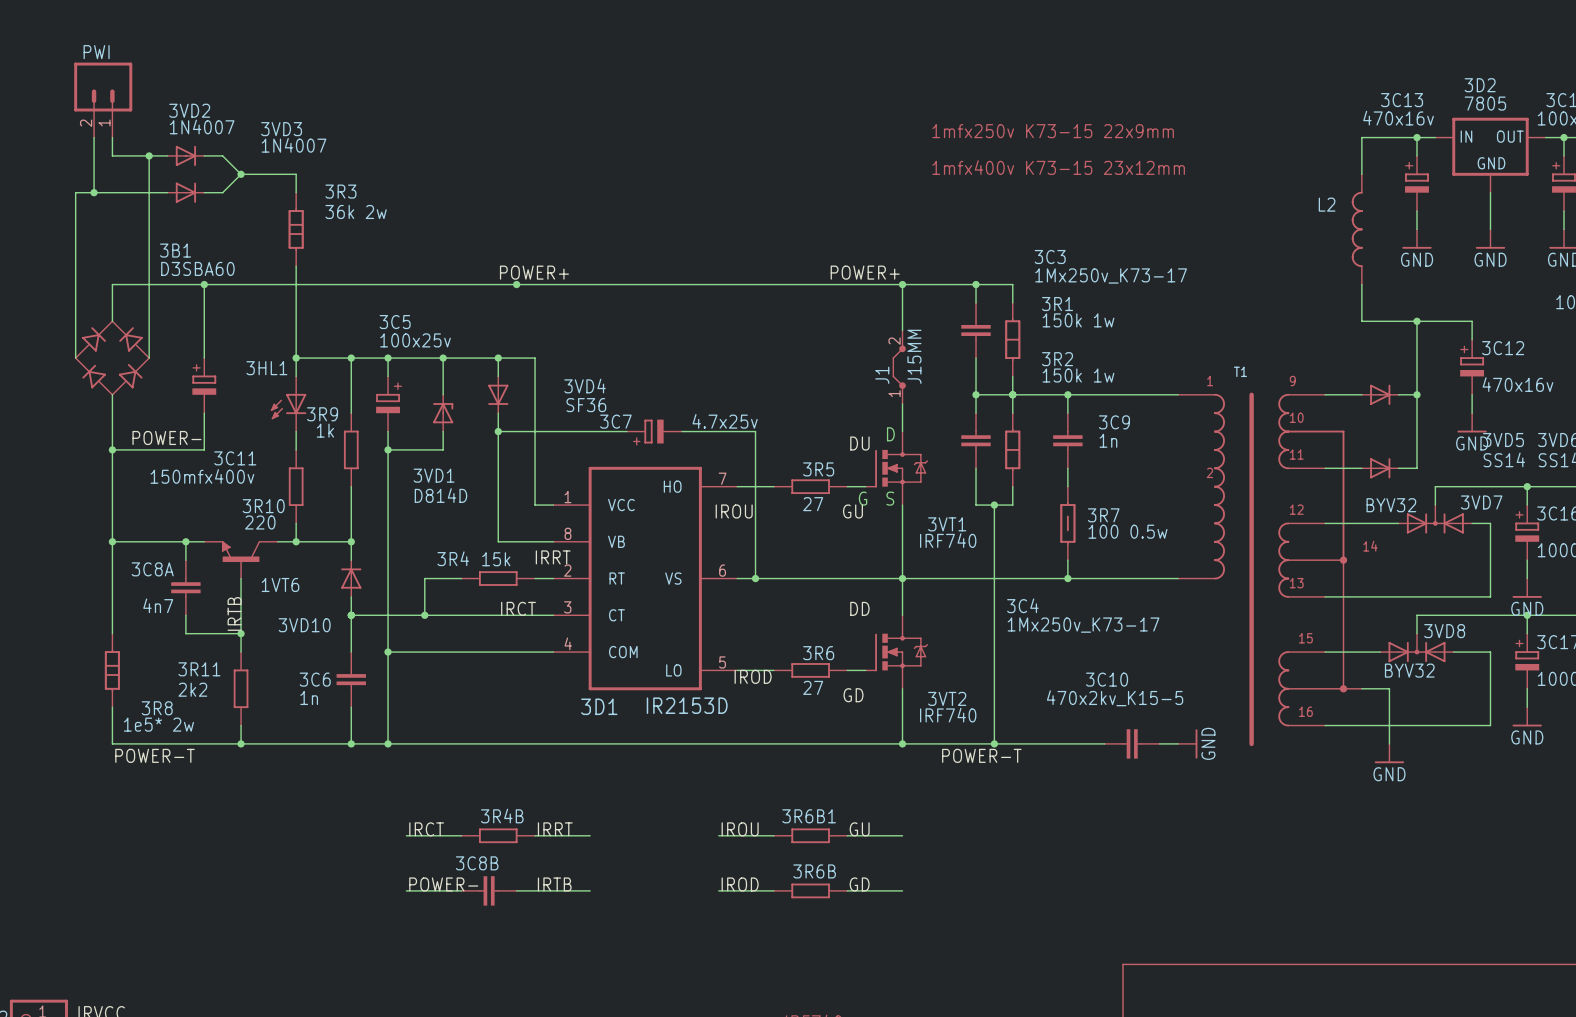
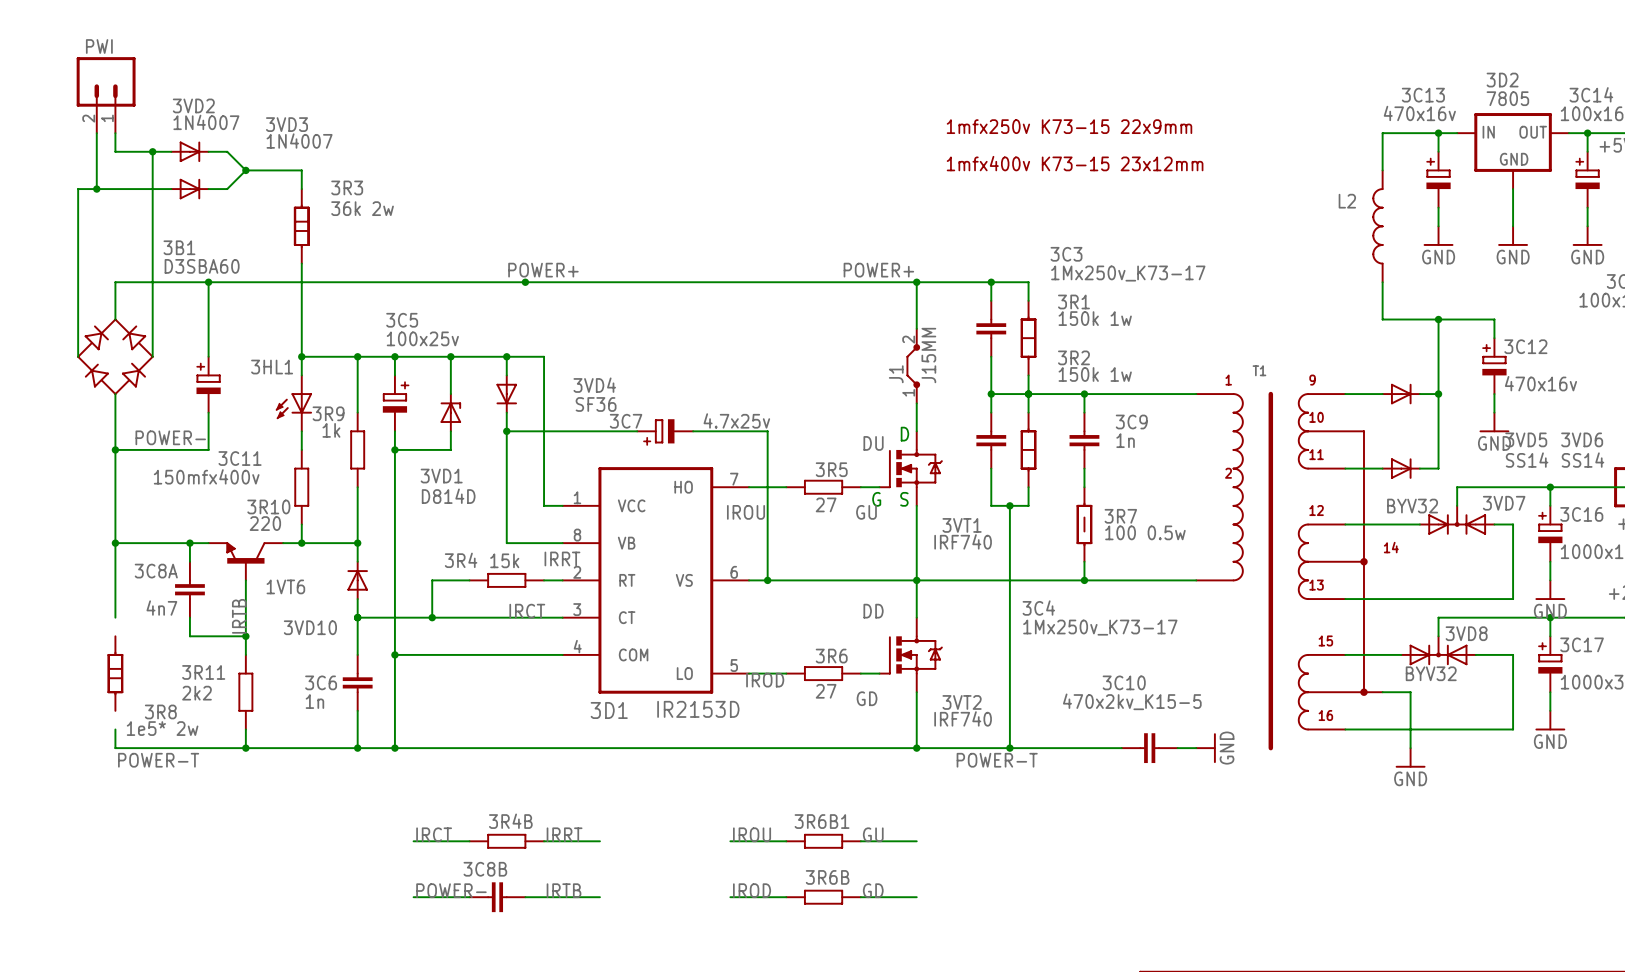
wire: (112, 615) (112, 633) -> none
wire: (112, 707) (112, 725) -> none

